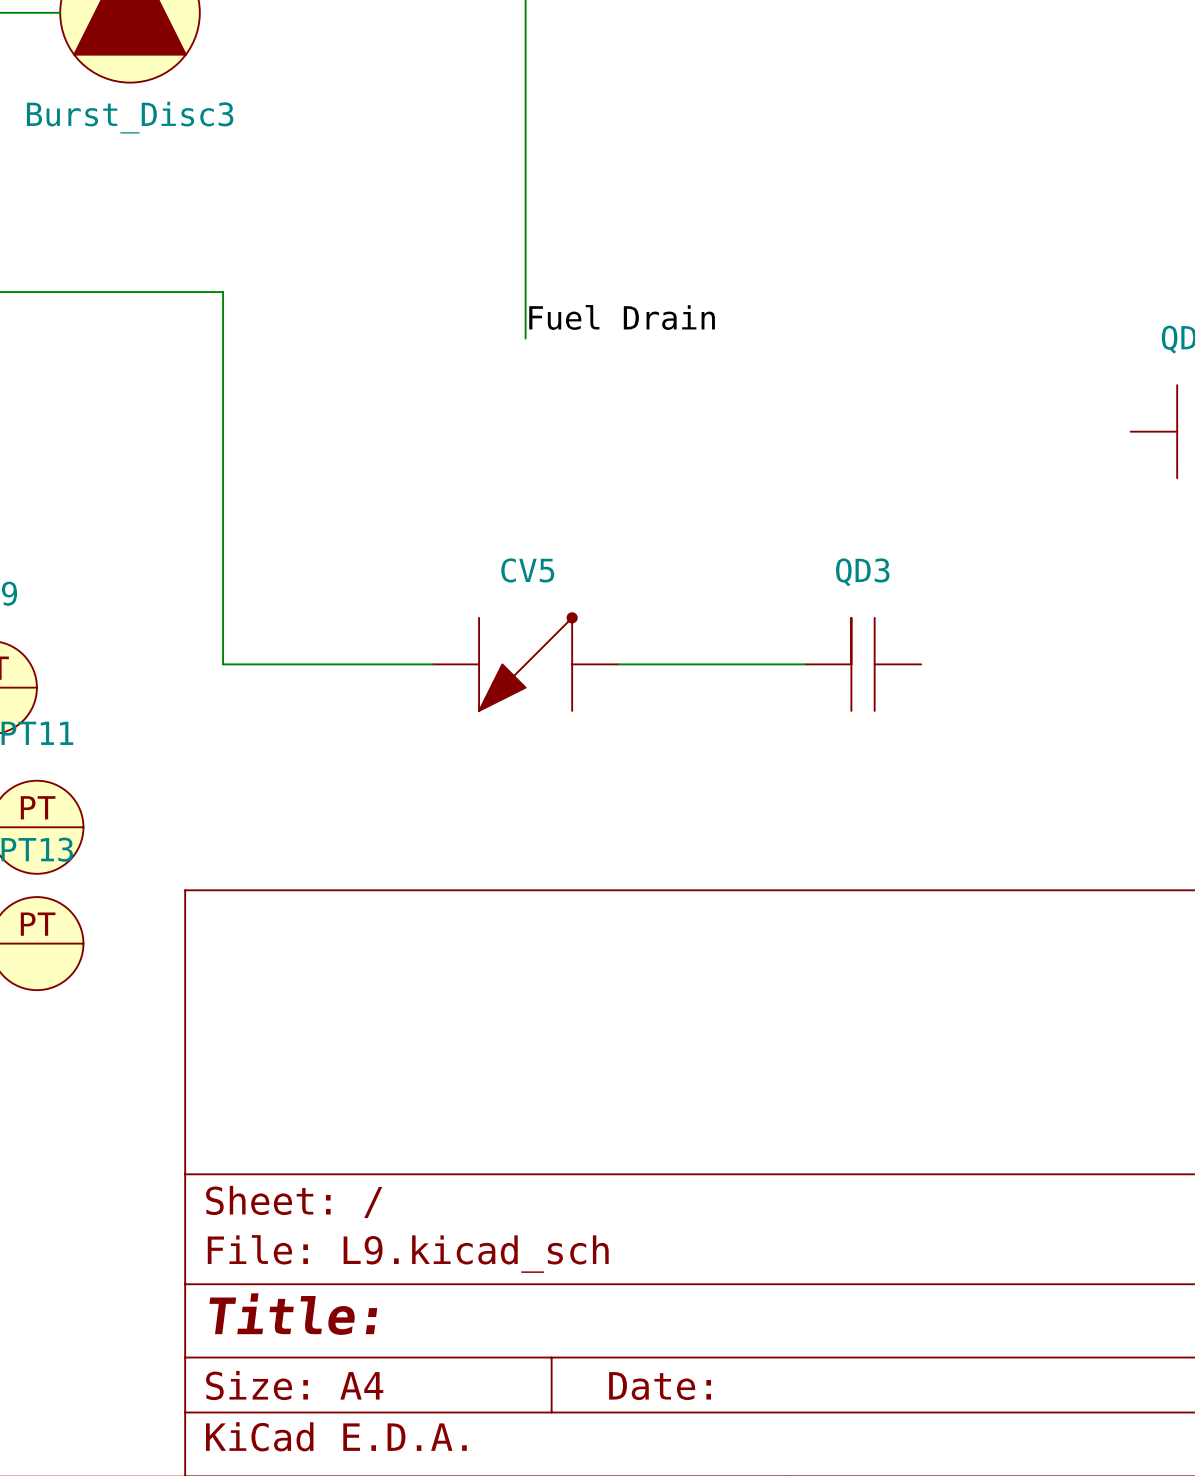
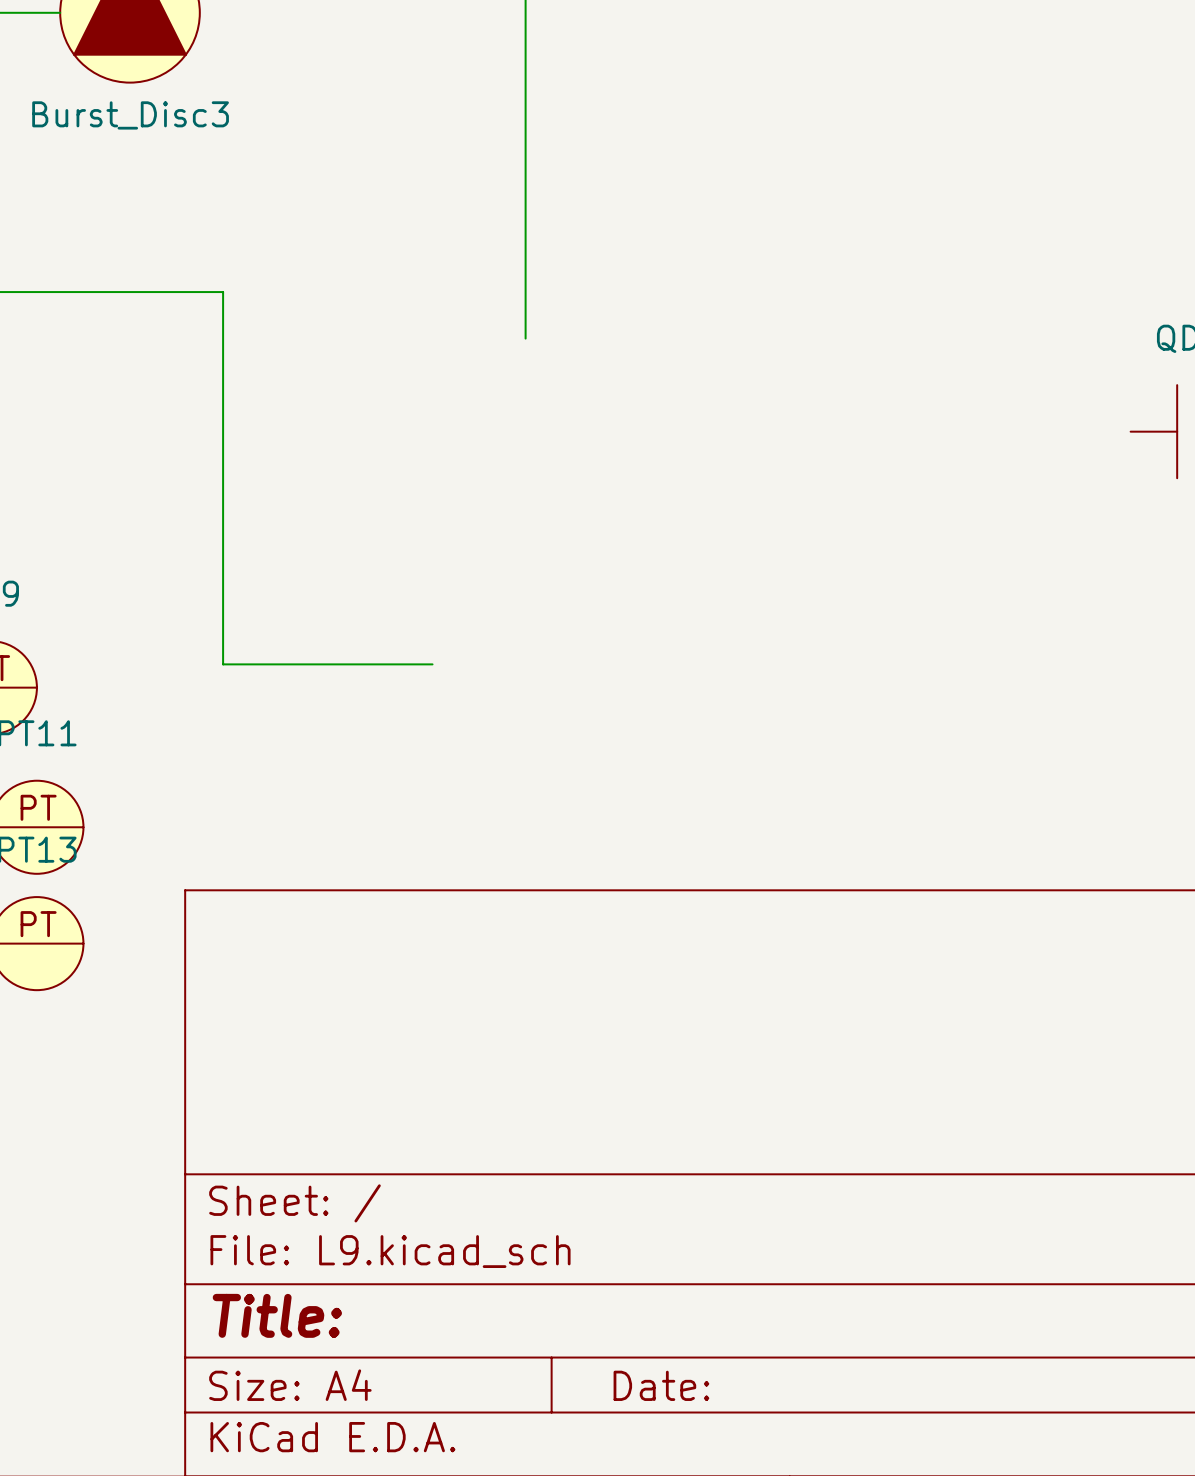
label: Fuel Drain (622, 317) -> none
CV5: (525, 662) -> none
wire: (618, 664) (804, 664) -> none
QD3: (863, 664) -> none

